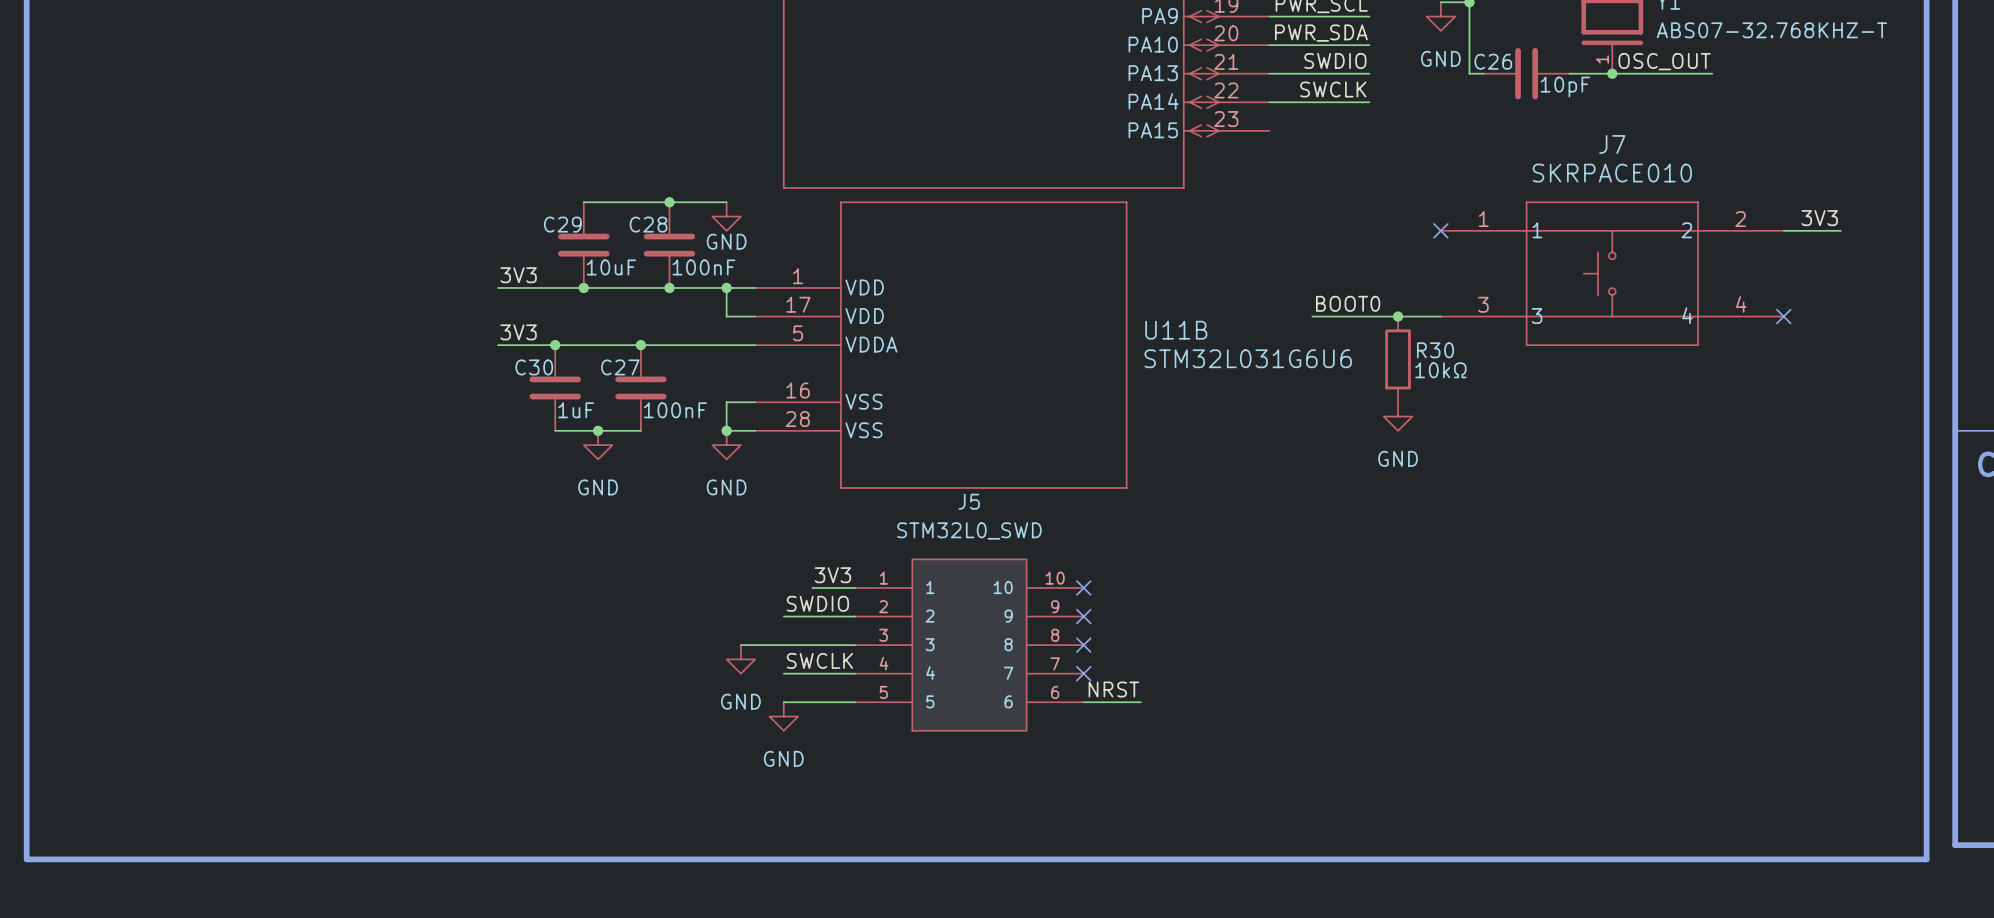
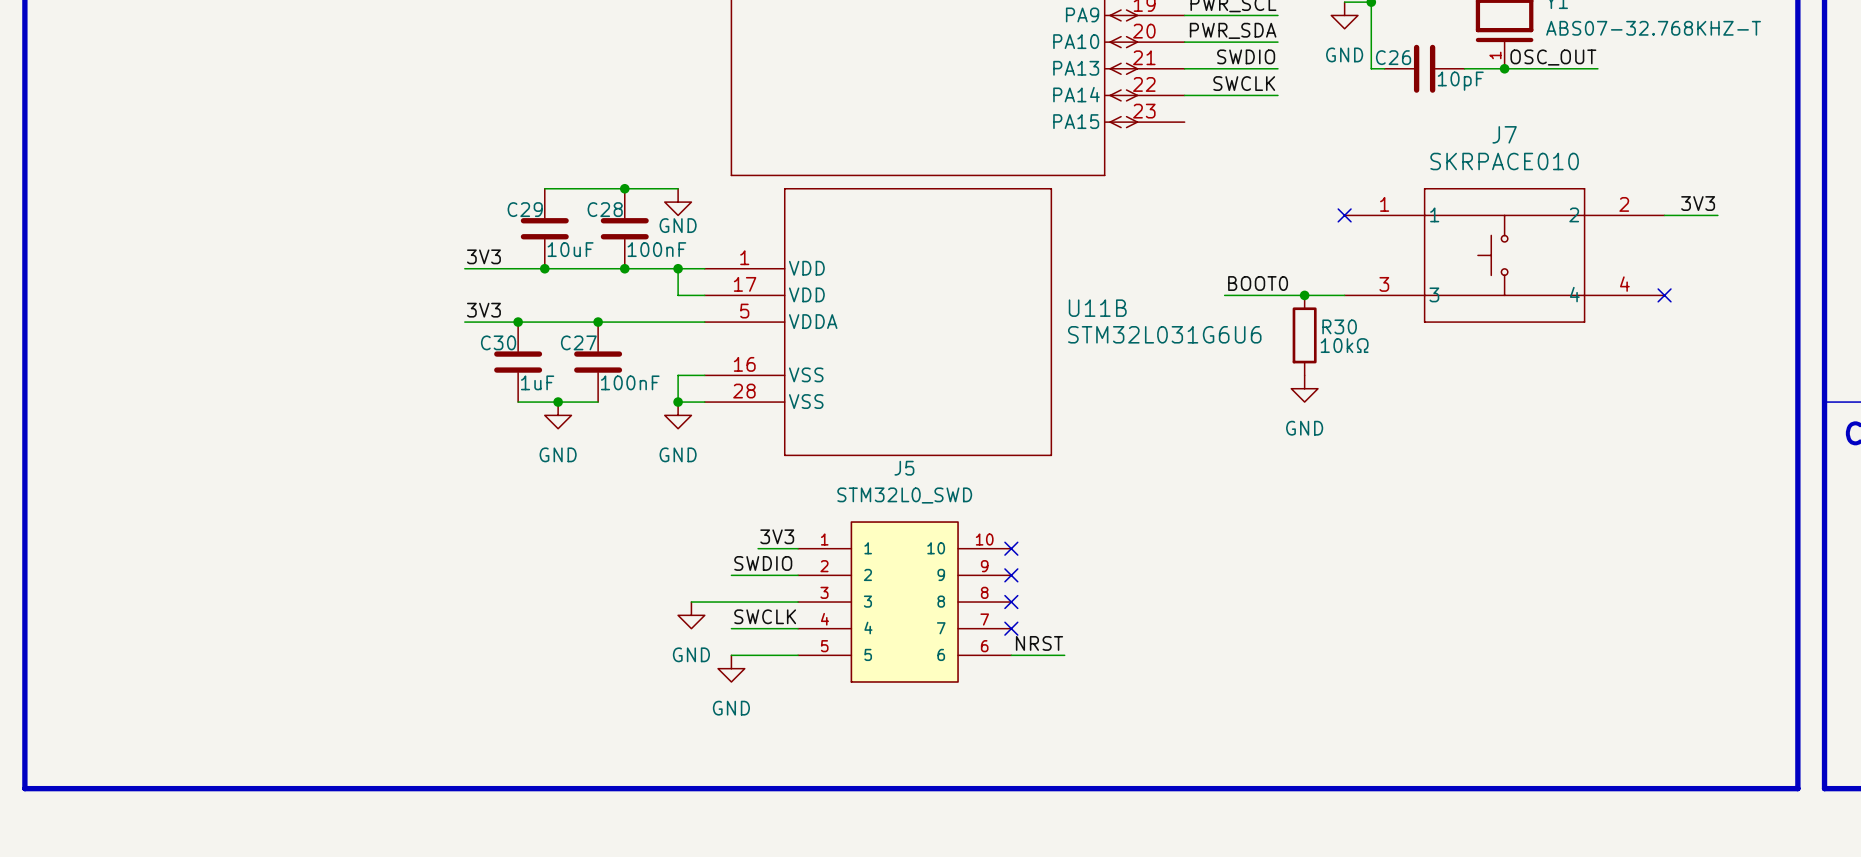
line: (26, 845) (26, 859) (1926, 859) (1926, 845) -> (24, 788) (1797, 788)

